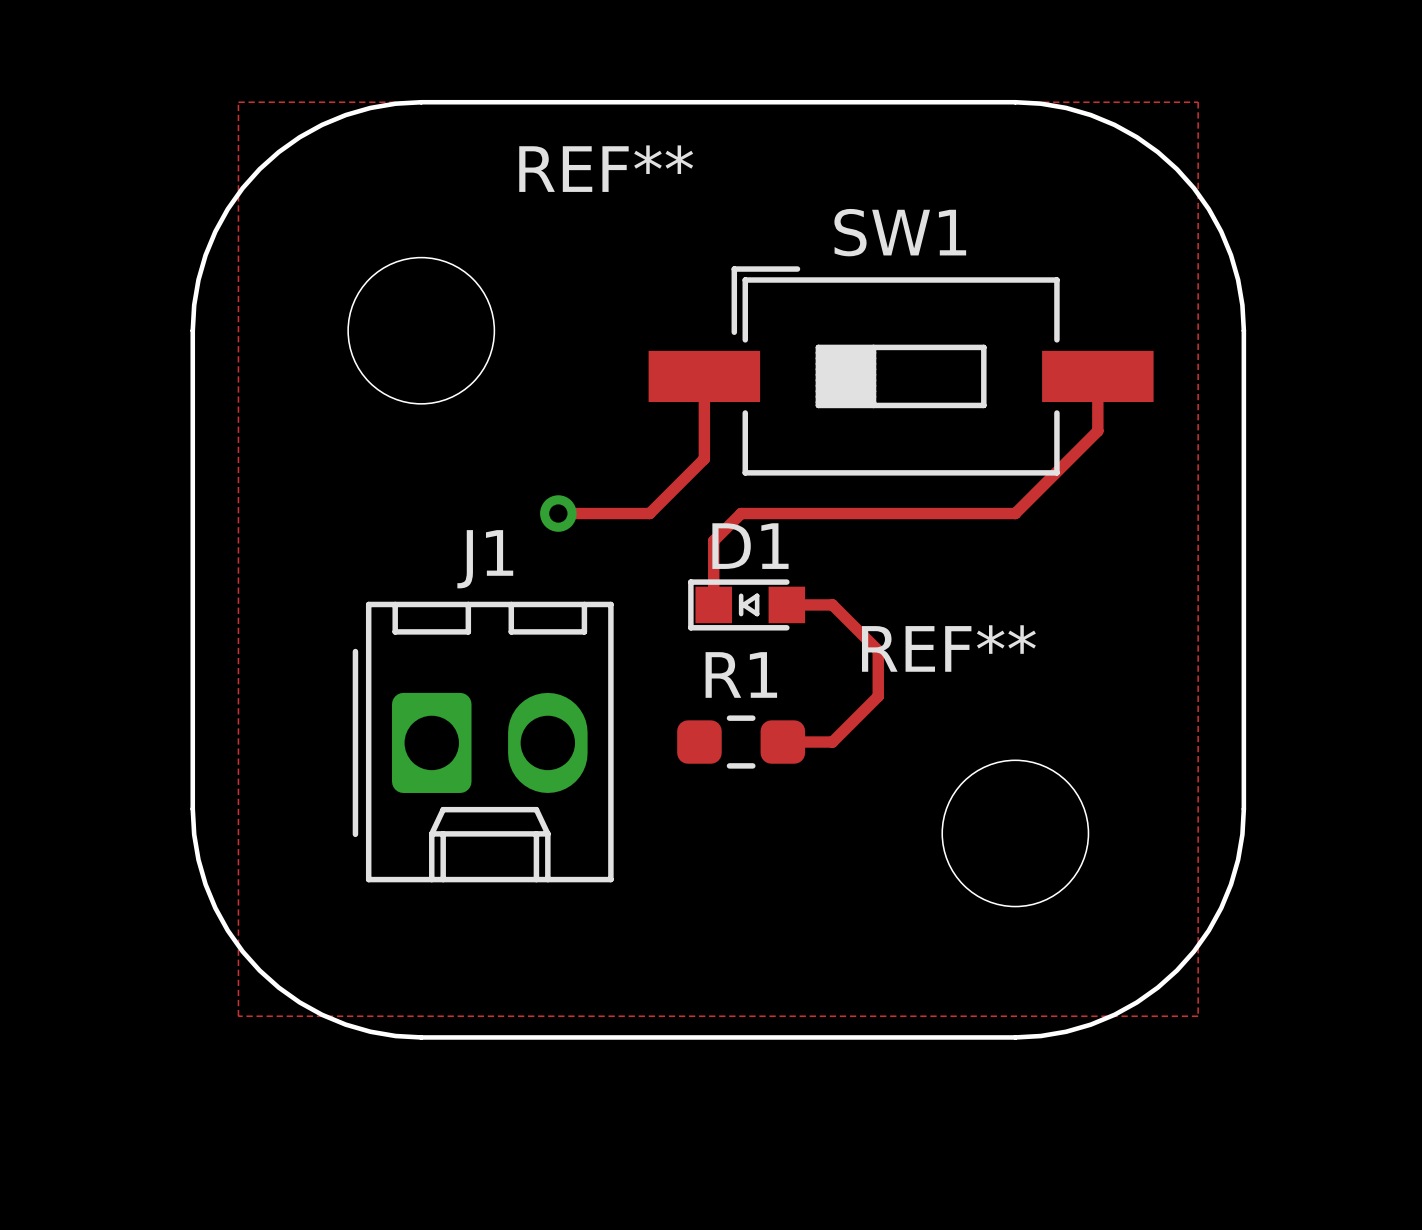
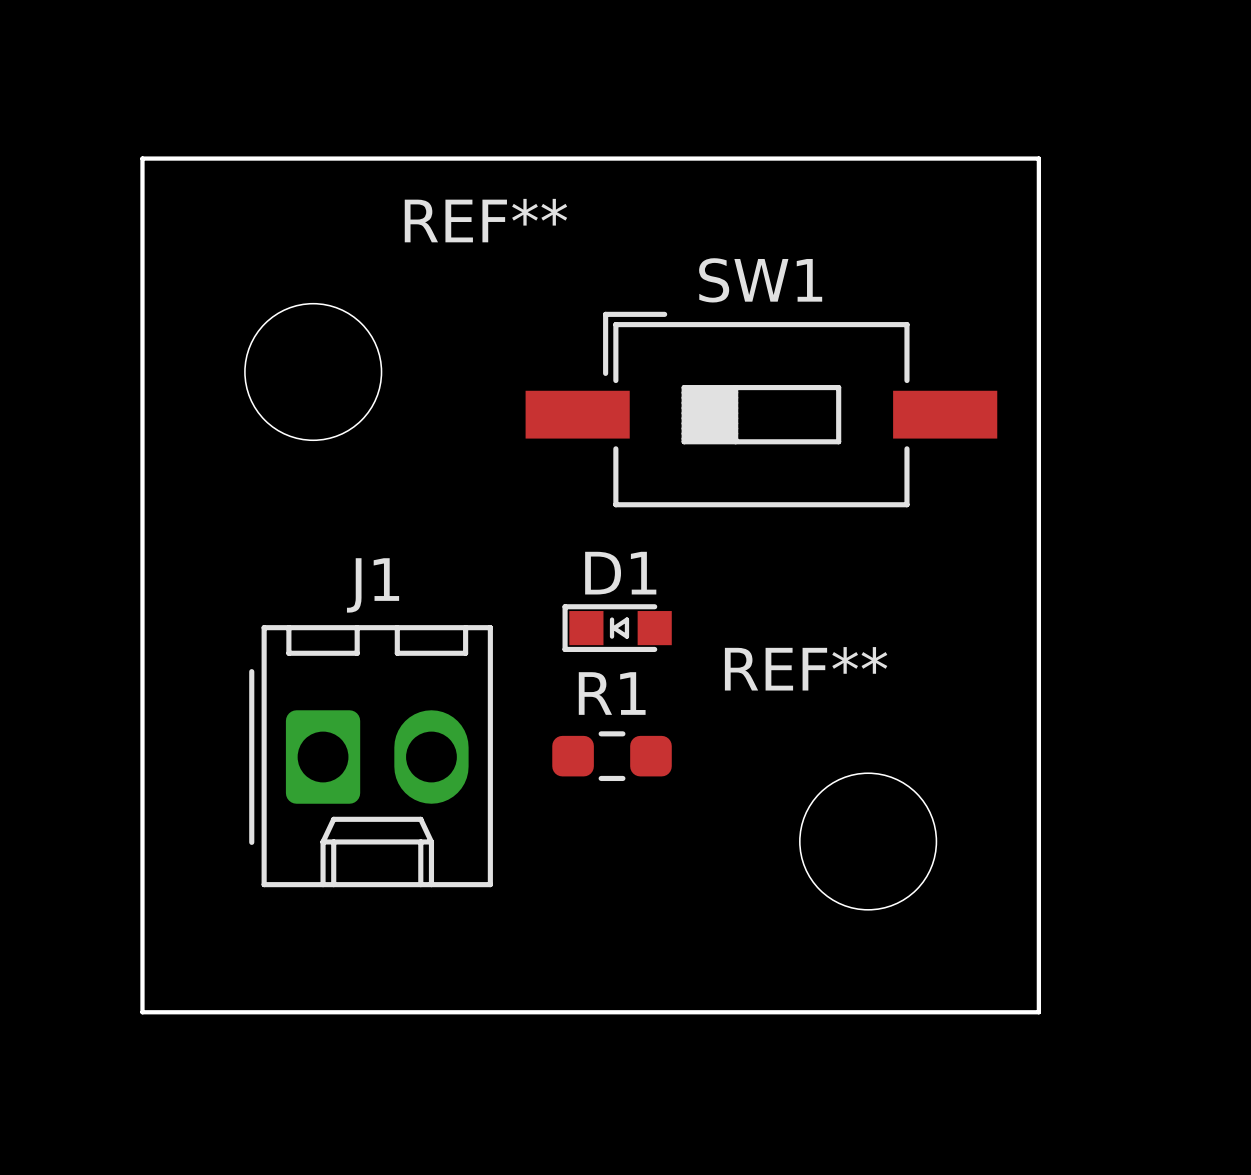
zone outline: (238, 102) (1198, 102) (1198, 1016) (238, 1016) (238, 102) -> none
board edge: (421, 102) (370, 107) (322, 124) (278, 152) (259, 169) (227, 209) (205, 255) (194, 305) (192, 330) (192, 808) (194, 834) (205, 884) (227, 930) (242, 951) (278, 987) (322, 1014) (345, 1024) (395, 1036) (421, 1037) (1040, 1036) (1090, 1024) (1136, 1002) (1176, 970) (1208, 930) (1231, 884) (1238, 859) (1243, 808) (1243, 330) (1238, 279) (1221, 231) (1208, 209) (1176, 169) (1157, 152) (1136, 137) (1090, 115) (1040, 103) (1015, 102) -> (313, 158) (142, 158) (142, 1012) (1038, 1012) (1038, 158) (868, 158)
track: (704, 376) (704, 458) (649, 513) (558, 513) -> none
track: (1097, 376) (1097, 431) (1015, 513) (741, 513) (713, 540) (713, 604) -> none
via: (558, 513) -> none
track: (786, 604) (832, 604) (878, 650) (878, 696) (832, 742) (782, 742) -> none

